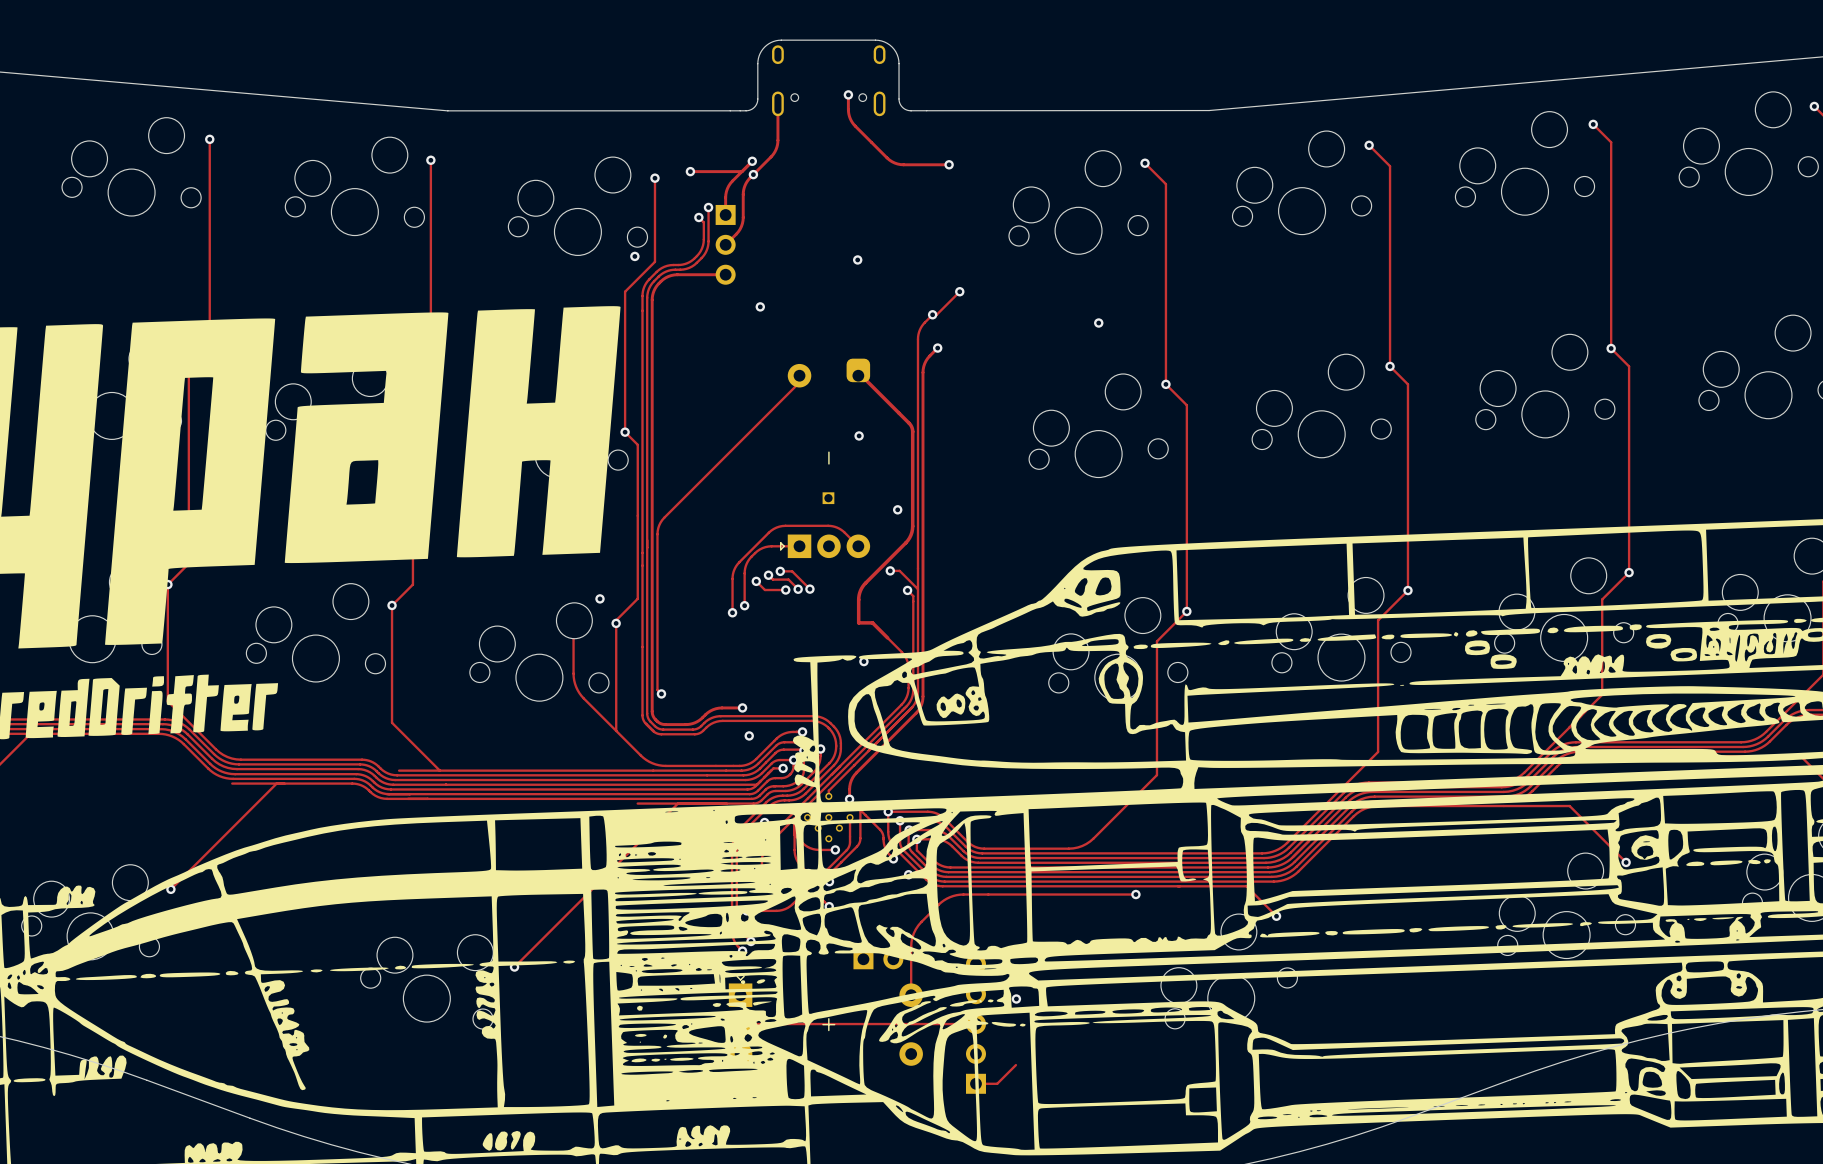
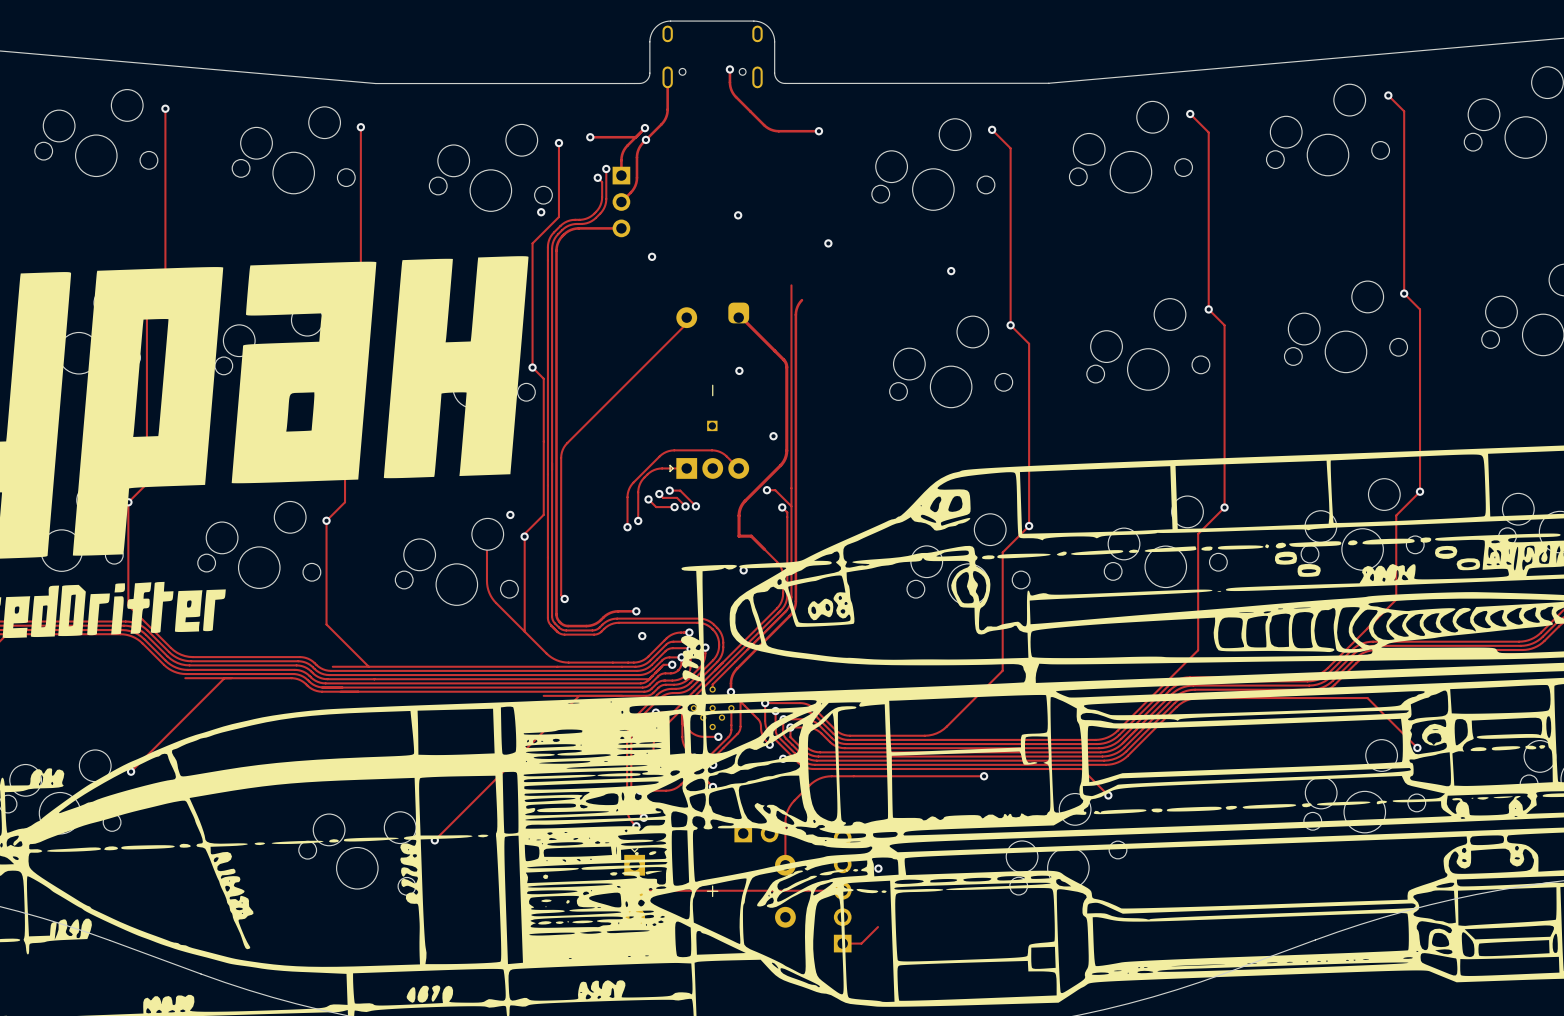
track: (959, 291) (936, 314) (932, 314) (923, 324) (917, 339) -> none
via: (932, 314) -> none
track: (935, 348) (937, 348) (929, 355) -> none
via: (937, 348) -> none

